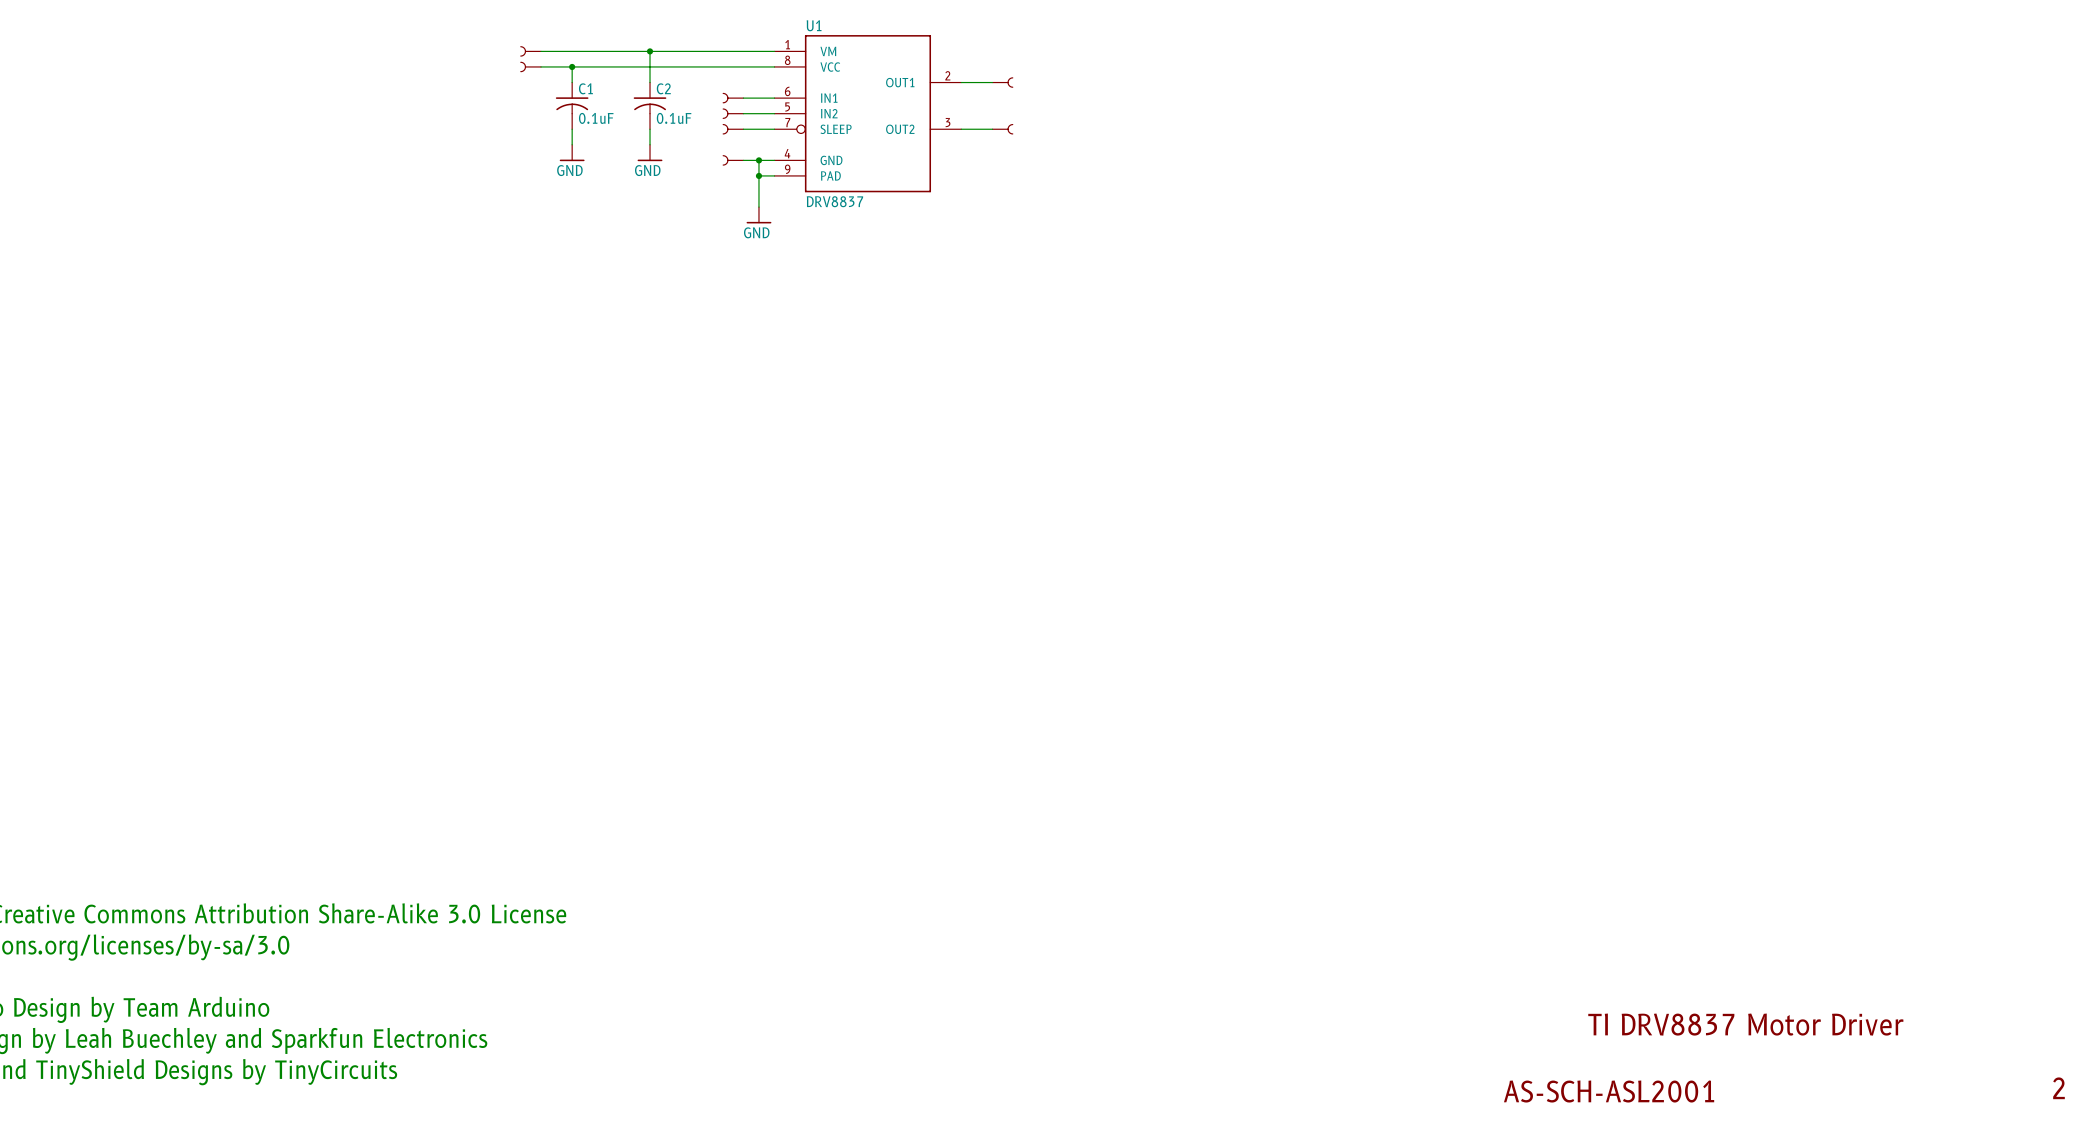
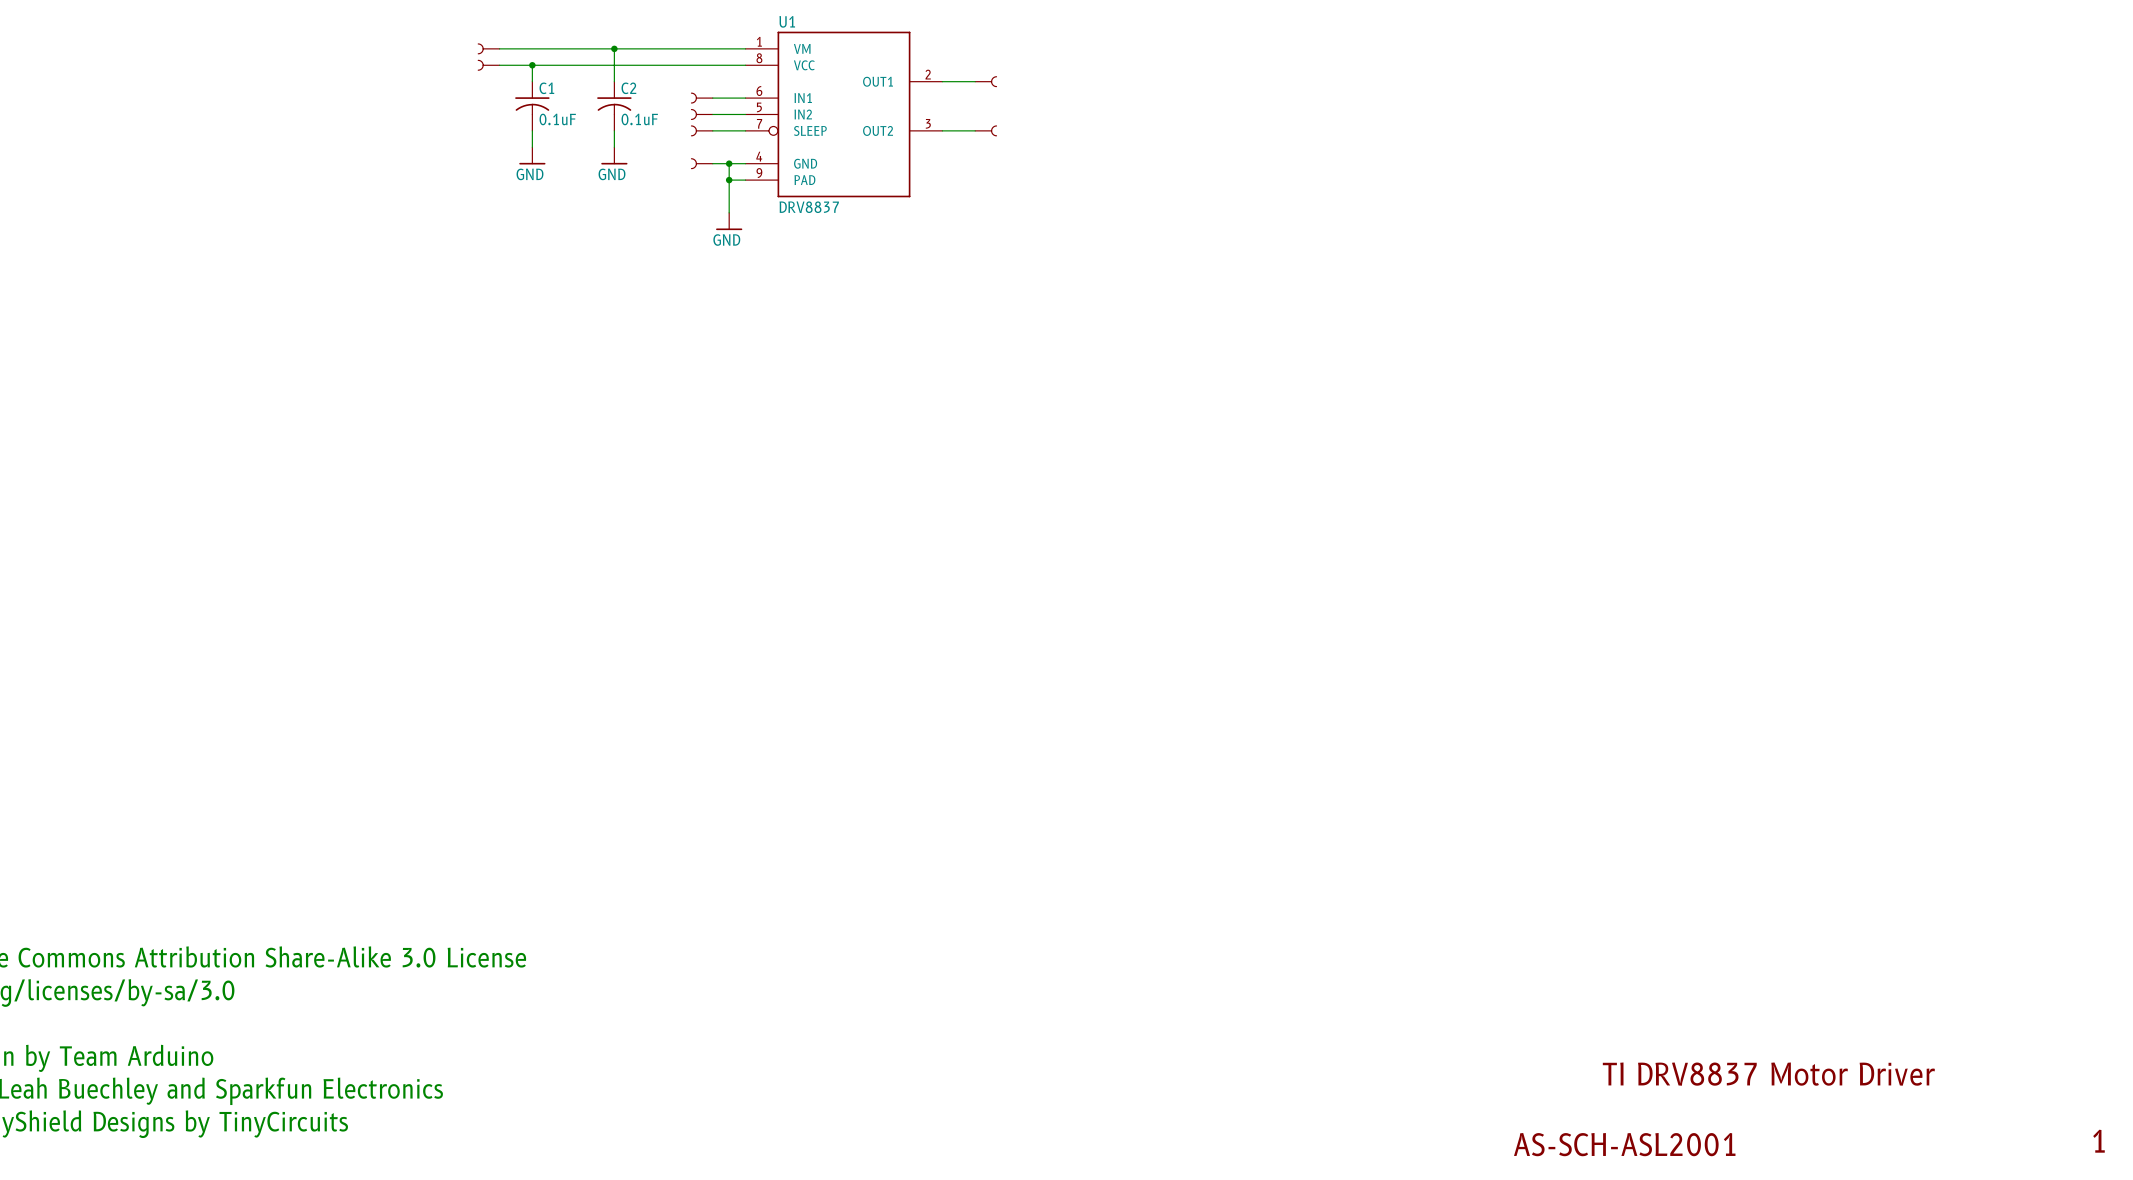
text: 2 (2058, 1088) -> 1 (2098, 1141)

